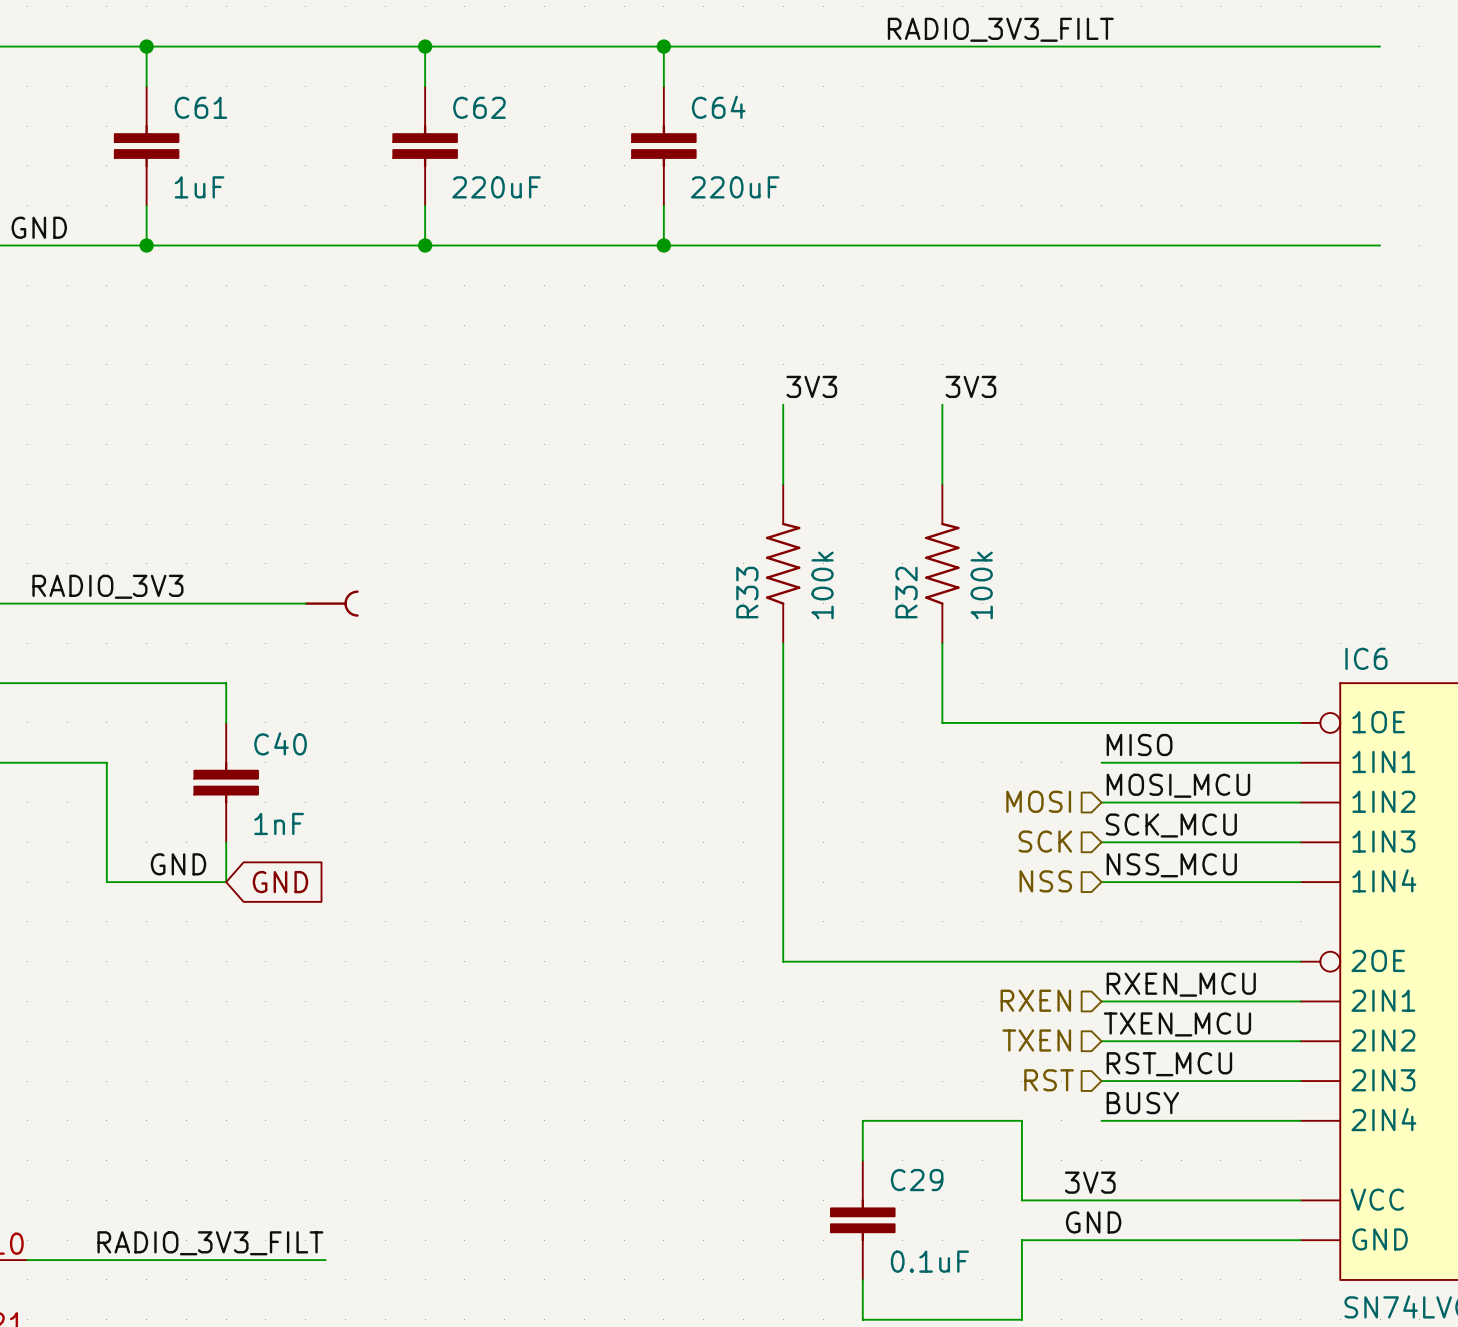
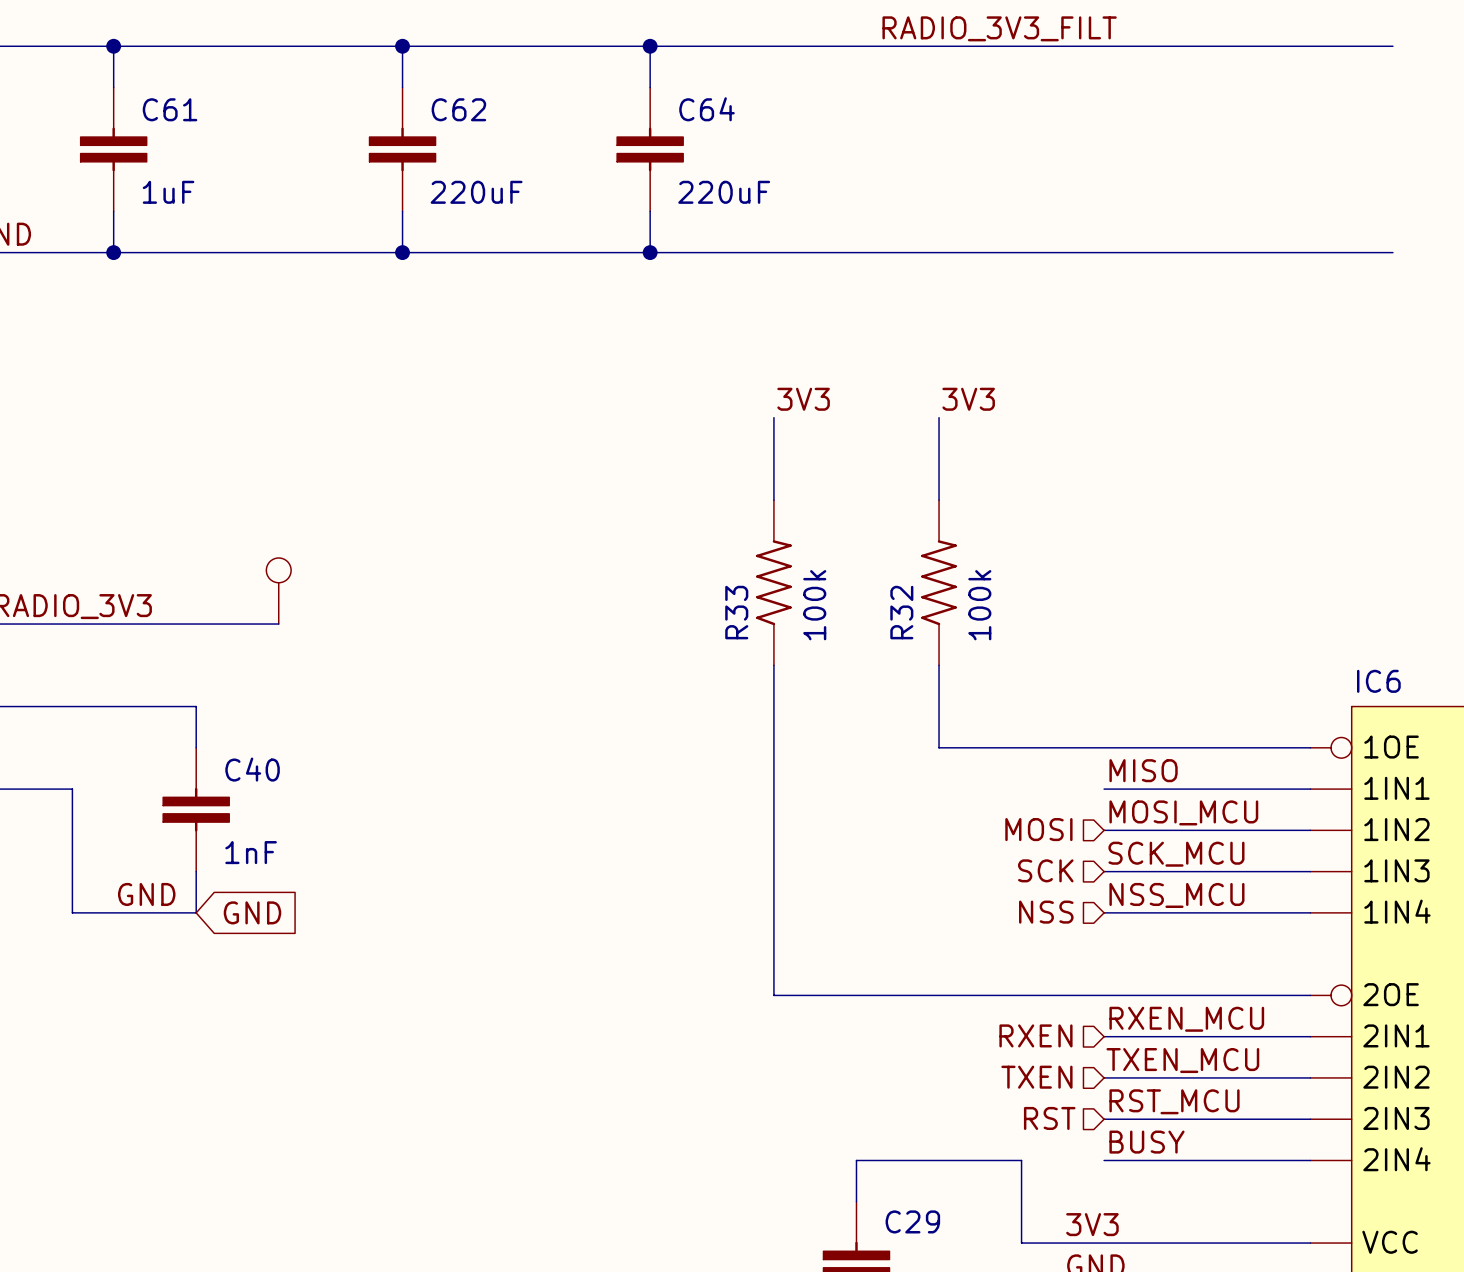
part: none -> (278, 591)
part: (331, 603) -> none

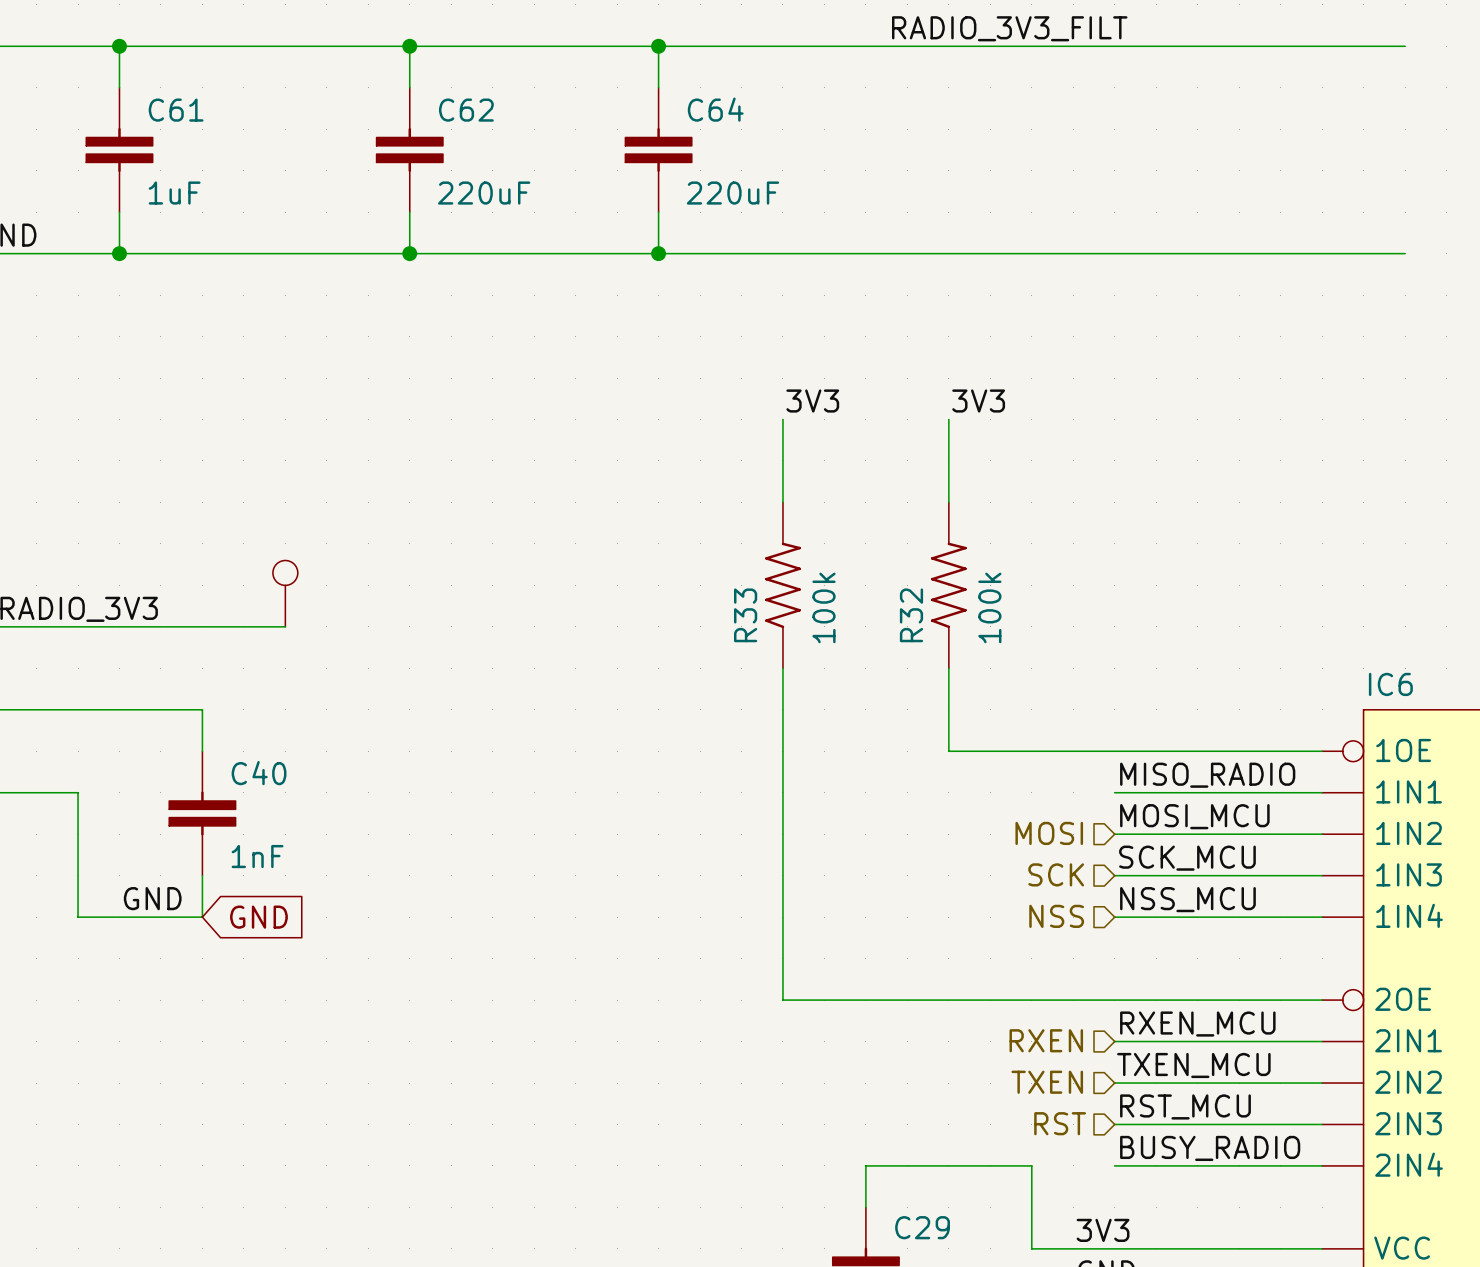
label: MISO (1143, 770) -> MISO_RADIO (1207, 775)
label: BUSY (1146, 1142) -> BUSY_RADIO (1210, 1148)

